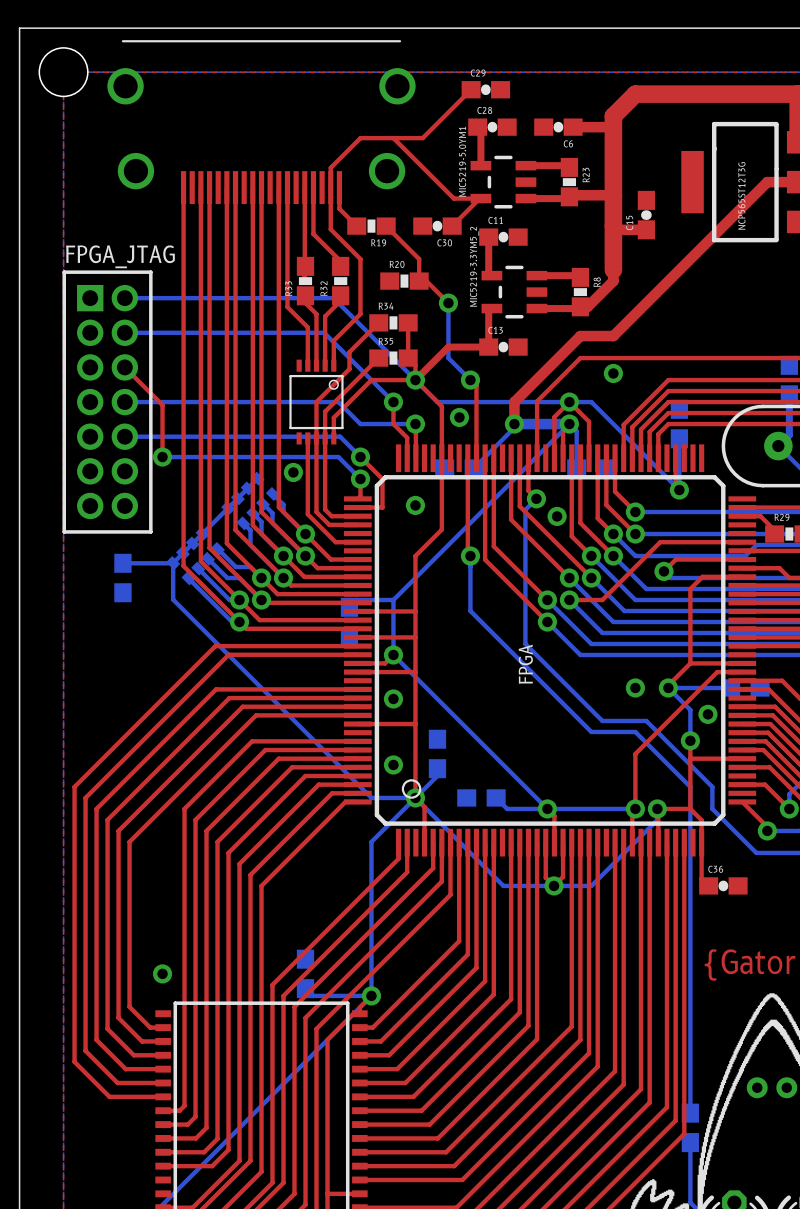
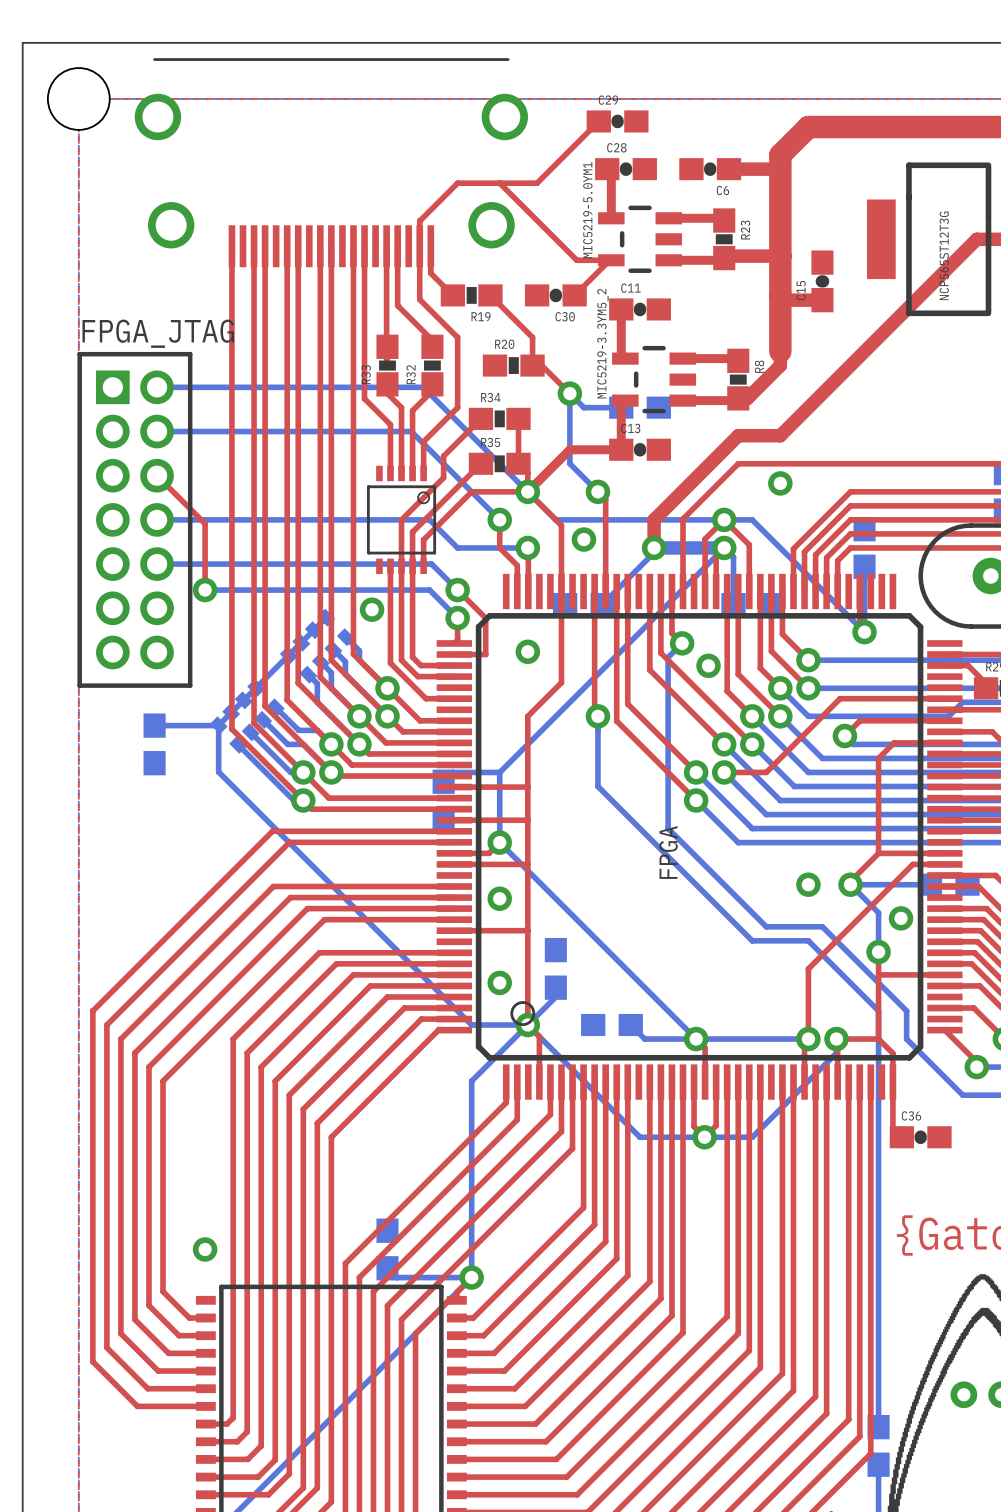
bottom track: none -> (569, 393) (583, 407) (621, 407)
part: none -> (640, 407)

